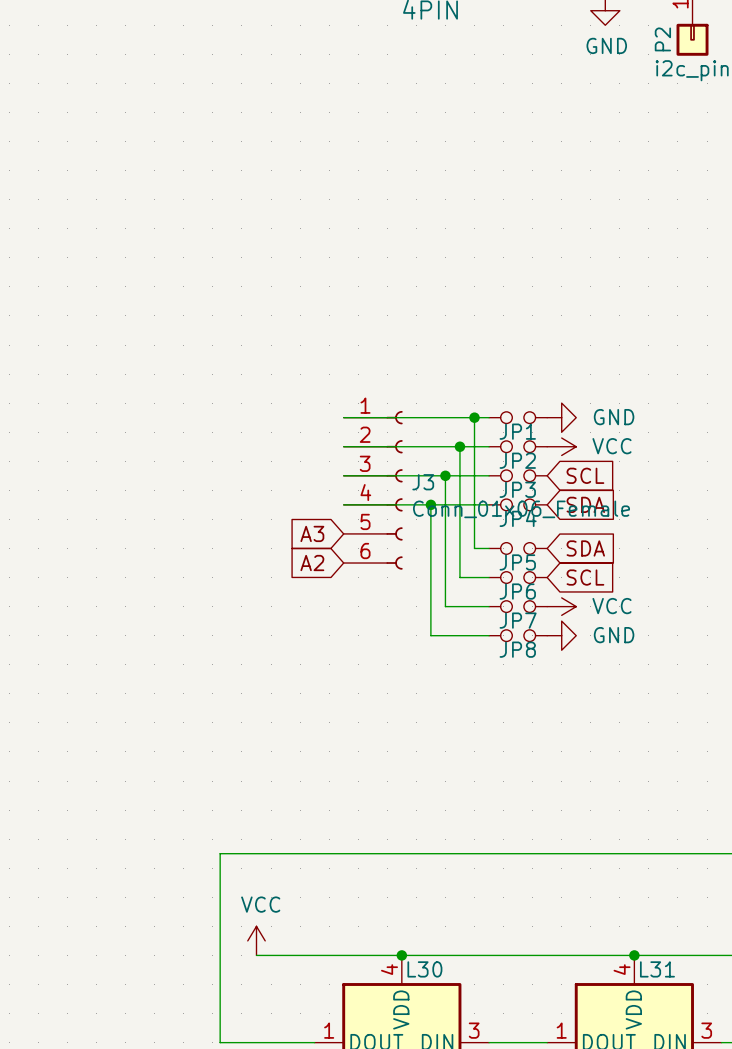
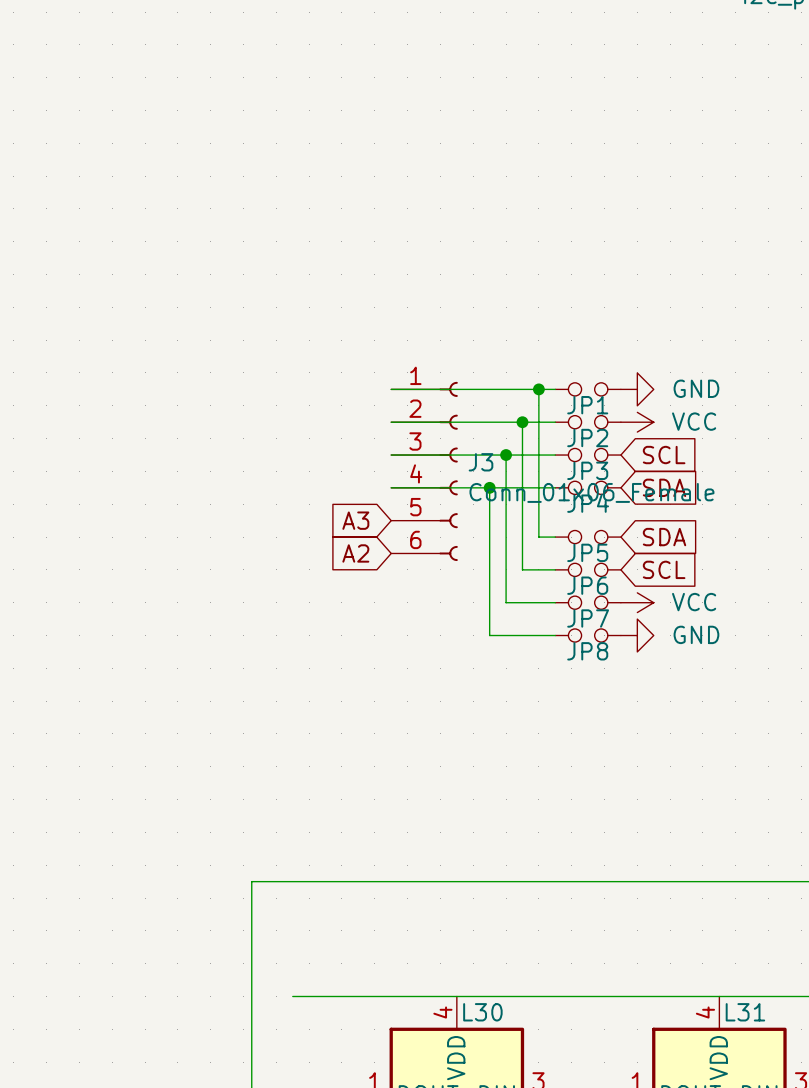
power symbol: VCC (256, 940) -> none
junction: (401, 955) -> none
junction: (634, 955) -> none

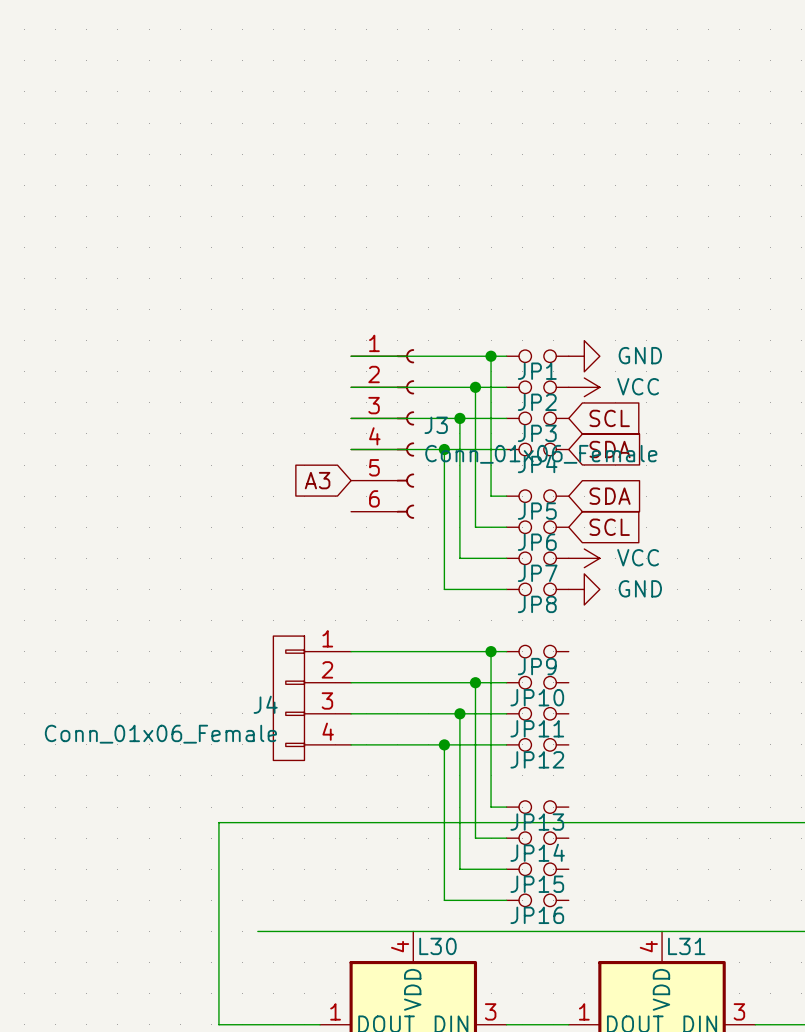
global label: A2 (355, 553) -> none
wire: none -> (351, 651) (506, 651)
wire: none -> (491, 651) (491, 807) (506, 807)
junction: none -> (491, 651)
JP9: none -> (537, 651)
wire: none -> (351, 682) (506, 682)
wire: none -> (475, 682) (475, 838) (506, 838)
junction: none -> (475, 682)
JP10: none -> (537, 682)
J4: none -> Conn_01x06_Female (312, 698)
wire: none -> (351, 713) (506, 713)
wire: none -> (459, 713) (459, 869) (506, 869)
junction: none -> (459, 713)
JP11: none -> (537, 713)
wire: none -> (351, 744) (506, 744)
wire: none -> (444, 744) (444, 900) (506, 900)
junction: none -> (444, 744)
JP12: none -> (537, 744)
JP13: none -> (537, 807)
JP14: none -> (537, 838)
JP15: none -> (537, 869)
JP16: none -> (537, 900)

